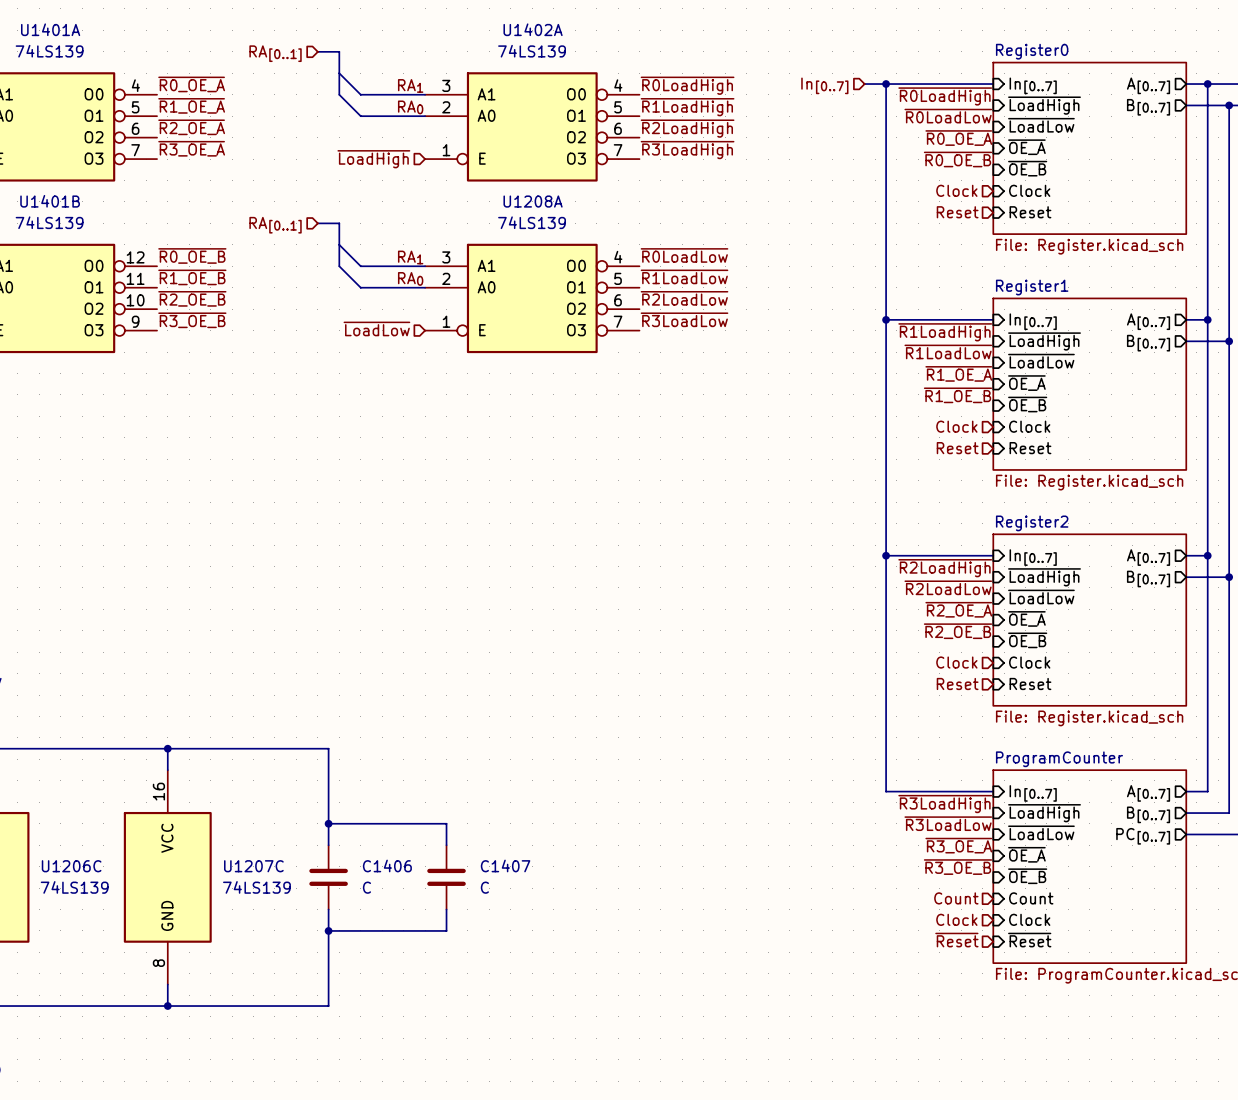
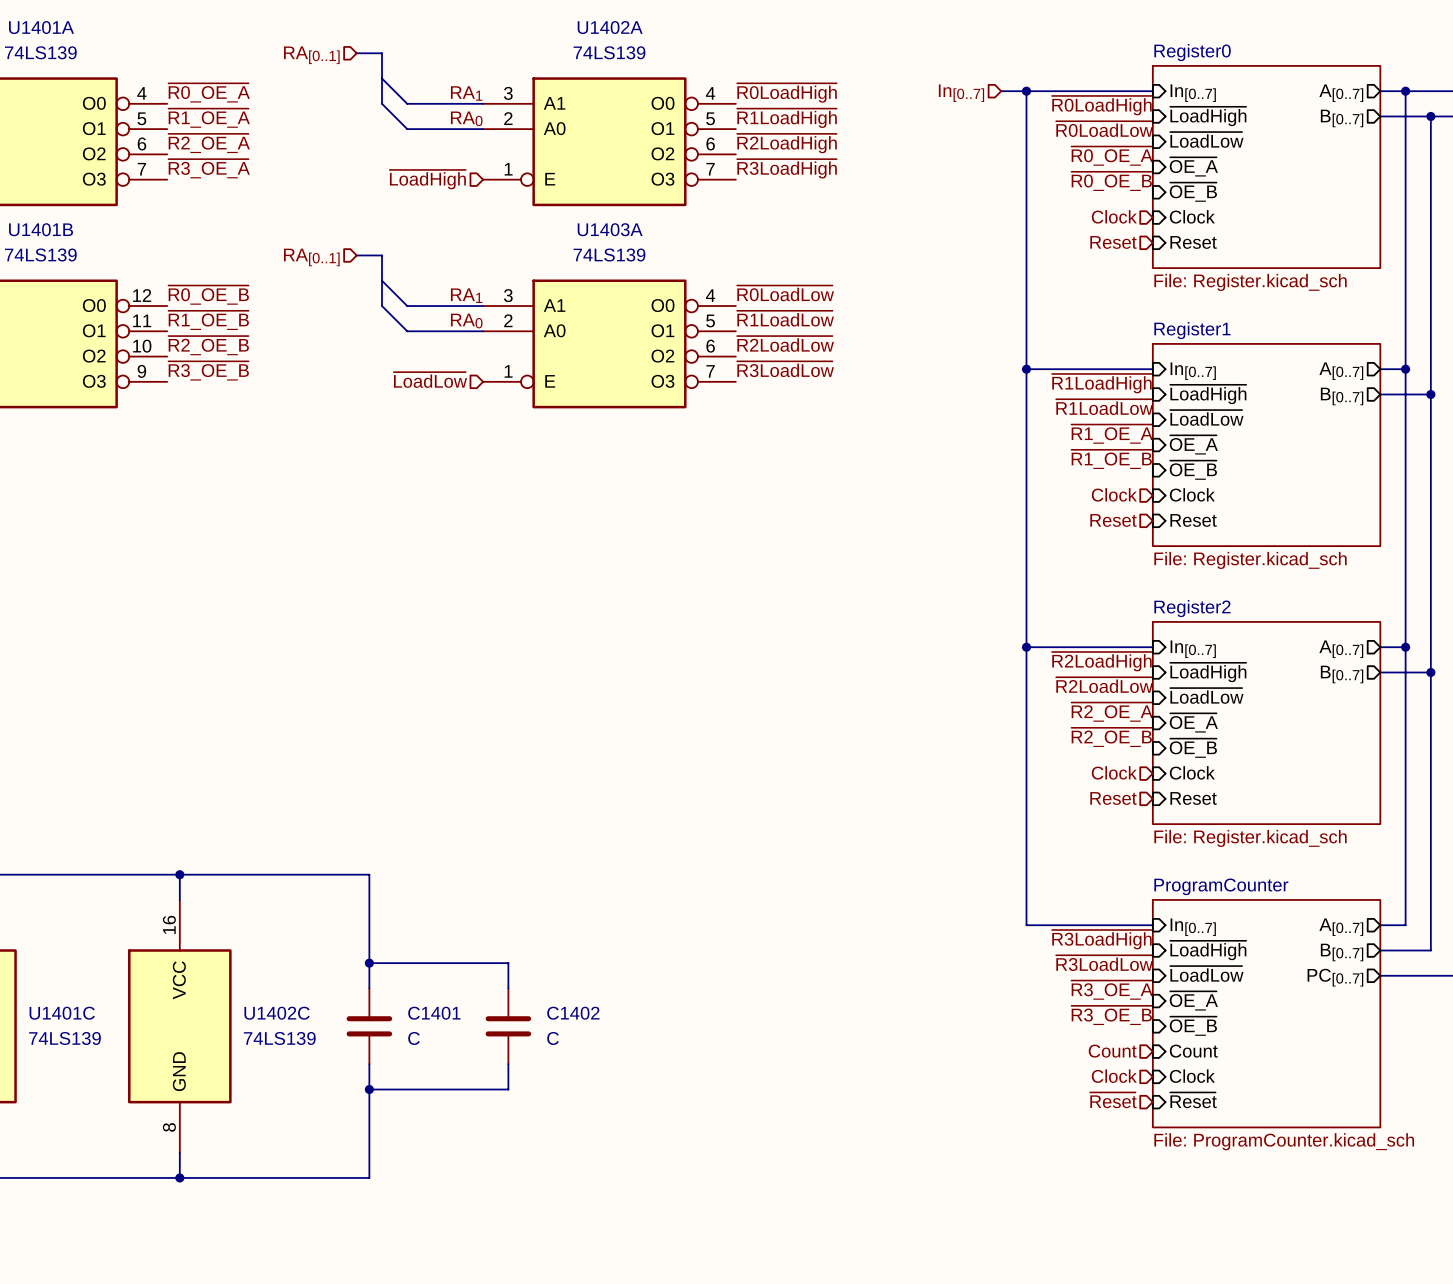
U1208A name: U1208A (533, 201) -> U1403A (610, 229)
C1406 name: C1406 (387, 865) -> C1401 (434, 1013)
C1407 name: C1407 (505, 865) -> C1402 (573, 1013)
U1206C name: U1206C (71, 866) -> U1401C (62, 1013)
U1207C name: U1207C (253, 866) -> U1402C (277, 1013)

